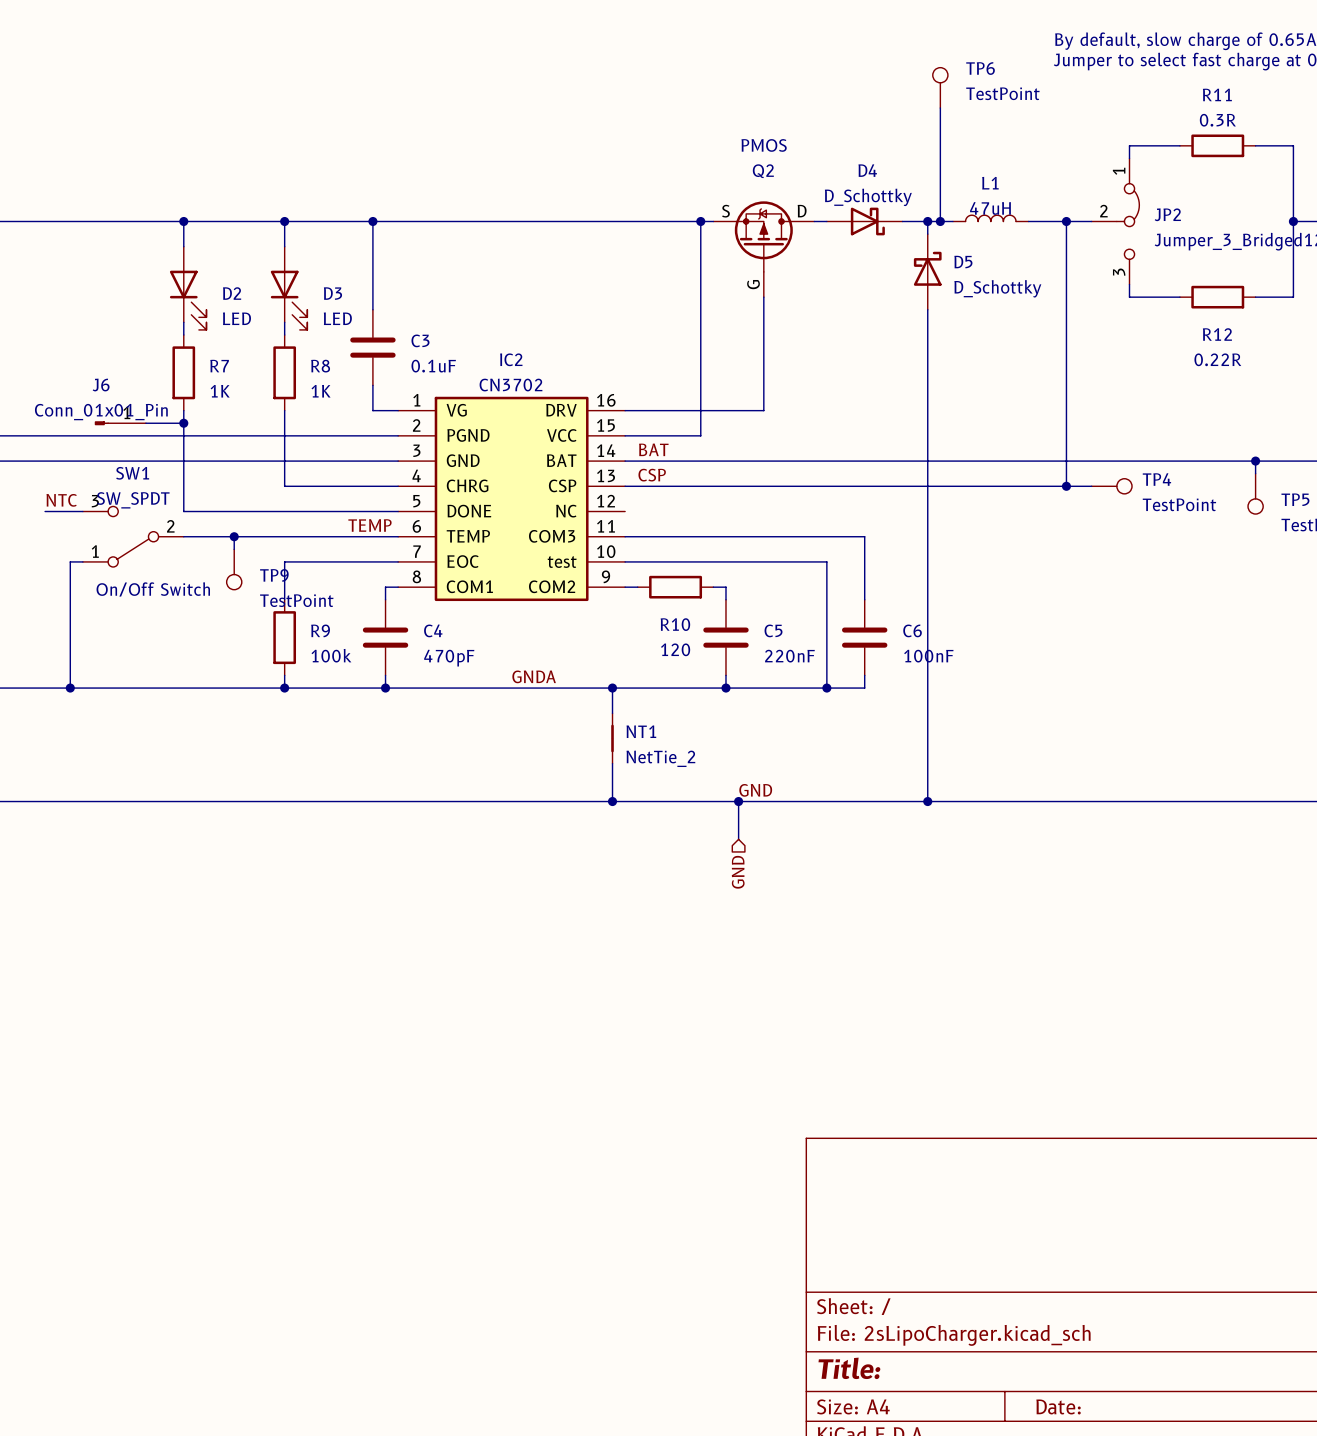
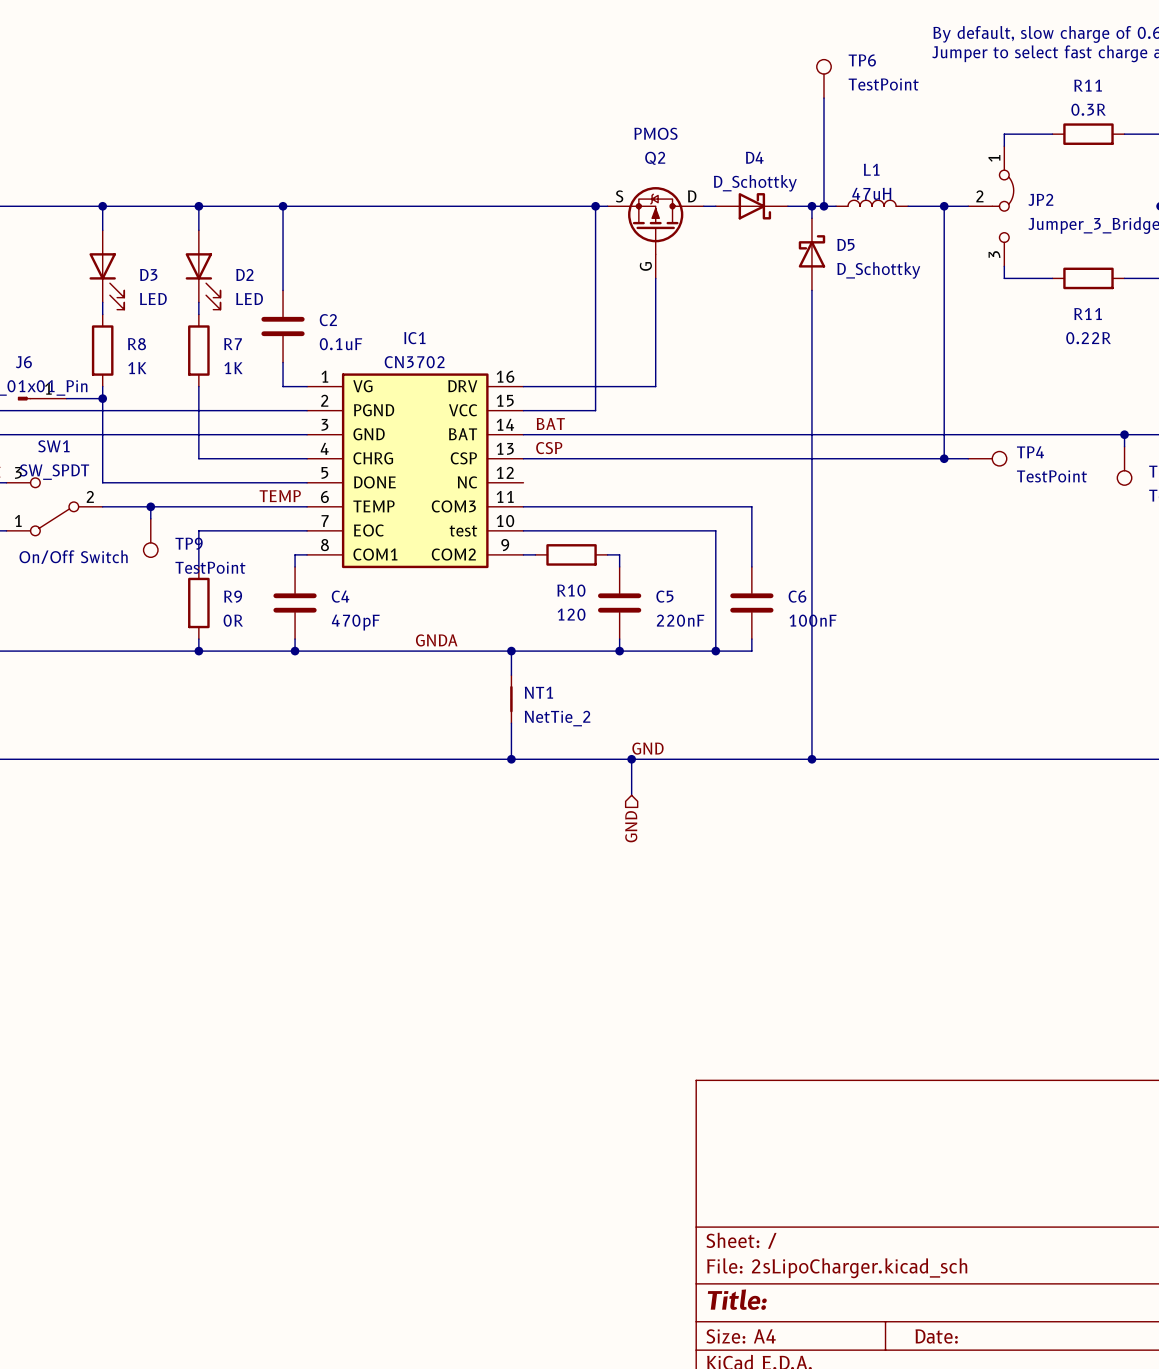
D2 name: D2 (232, 293) -> D3 (148, 274)
D3 name: D3 (332, 293) -> D2 (244, 274)
R12 name: R12 (1217, 334) -> R11 (1088, 314)
C3 name: C3 (420, 340) -> C2 (328, 320)
IC2 name: IC2 (511, 359) -> IC1 (414, 338)
R7 name: R7 (219, 366) -> R8 (136, 344)
R8 name: R8 (320, 366) -> R7 (233, 344)
R9 value: 100k (331, 655) -> 0R (233, 620)

